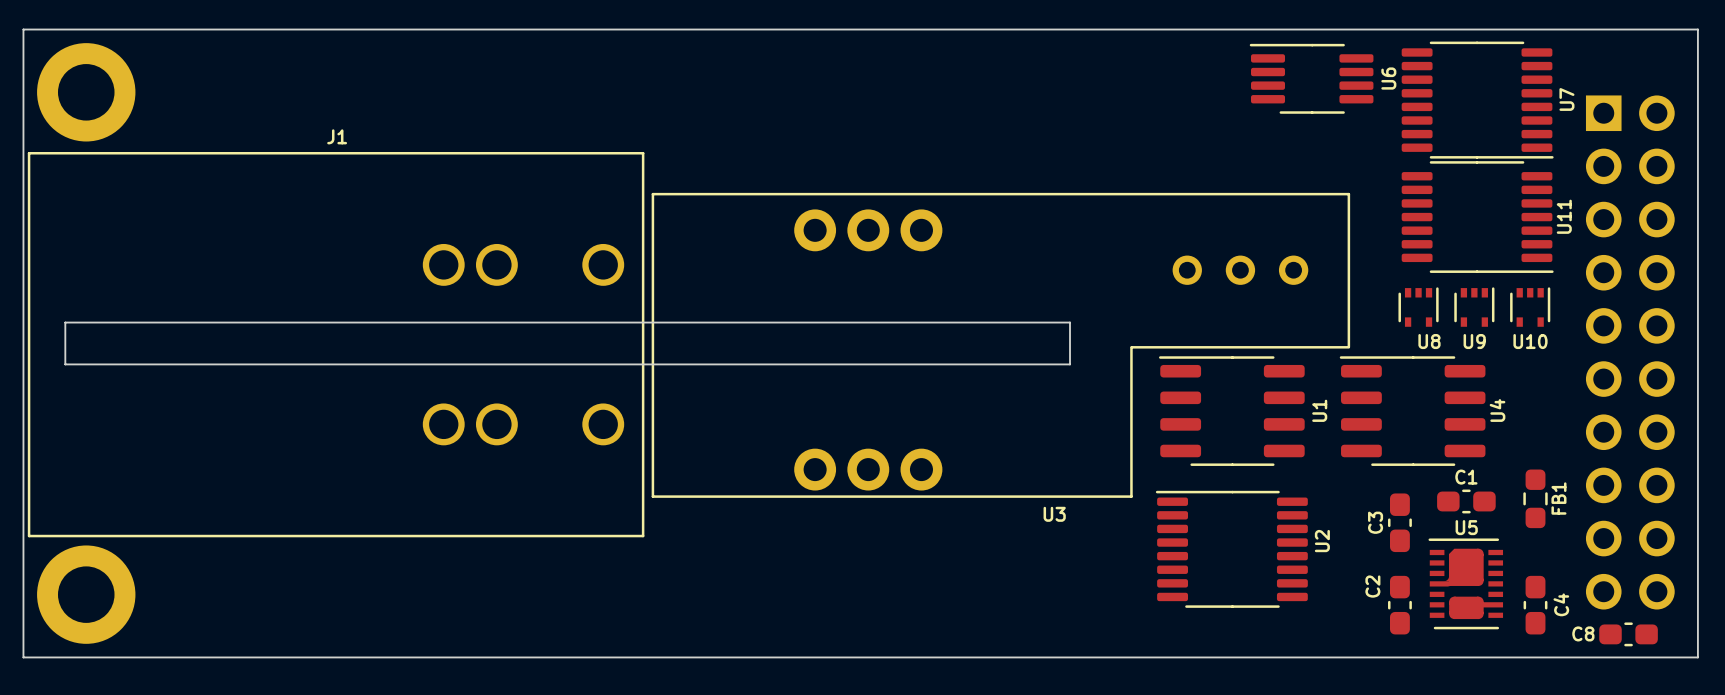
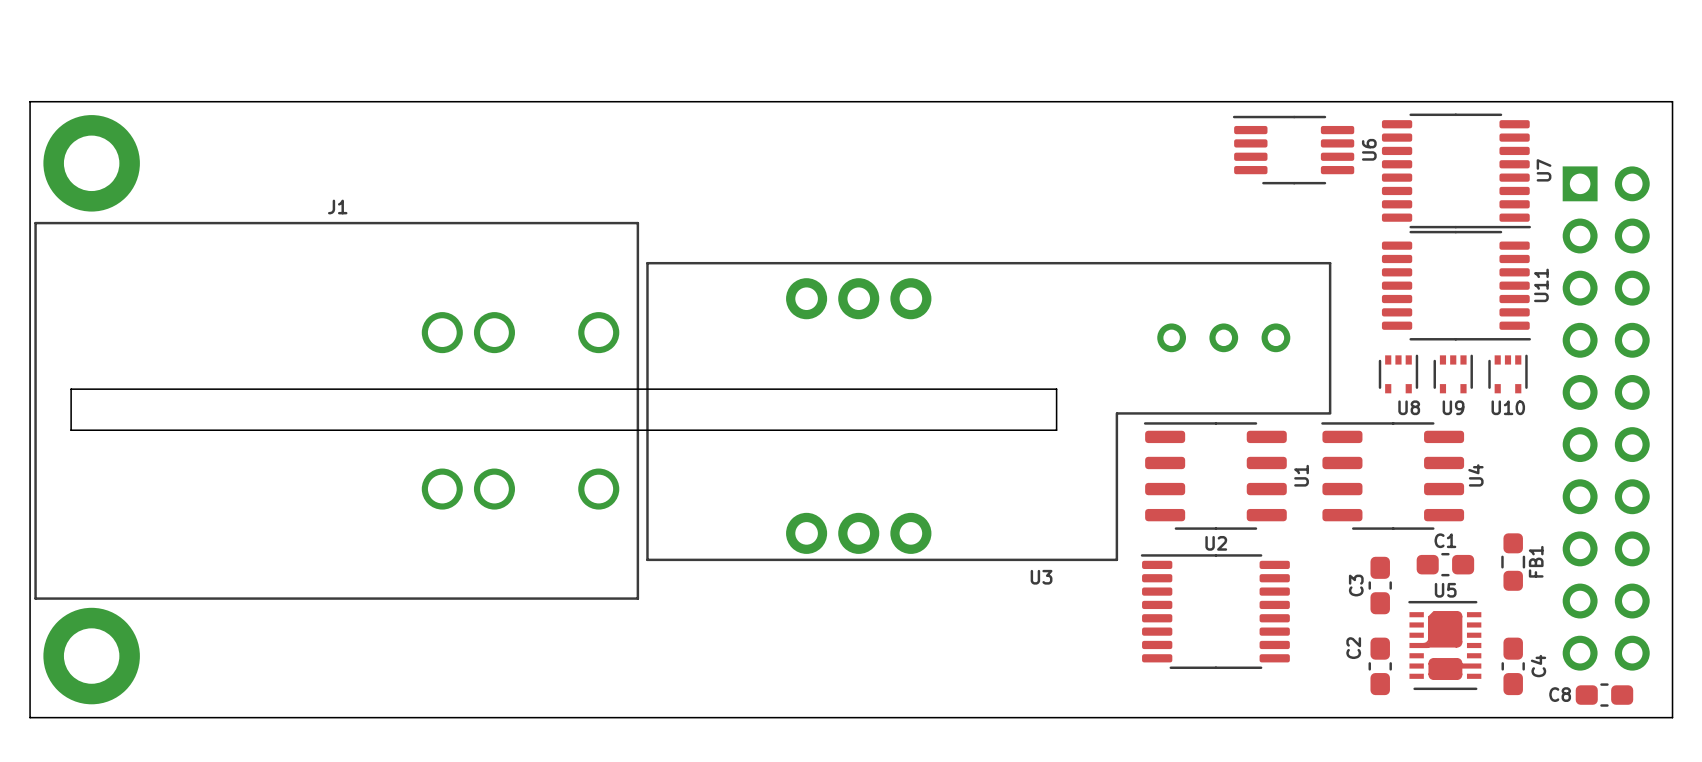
U2 name rotation: 0° (1322, 541) -> 90° clockwise (1216, 543)
U2 name position: U2 (1322, 541) -> U2 (1216, 543)

